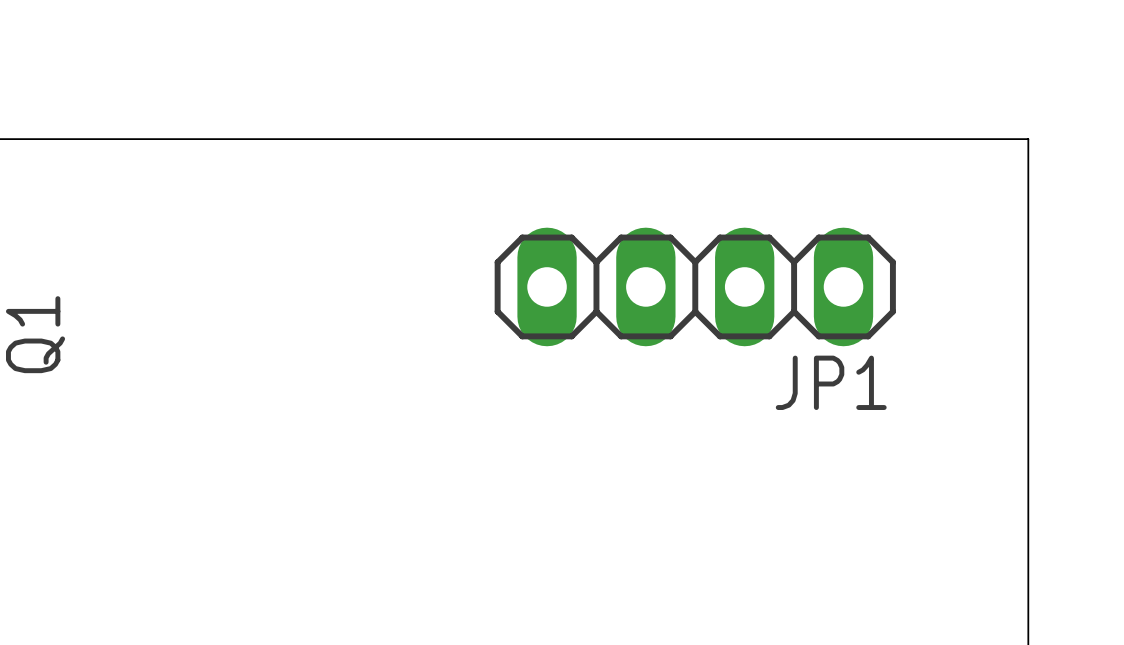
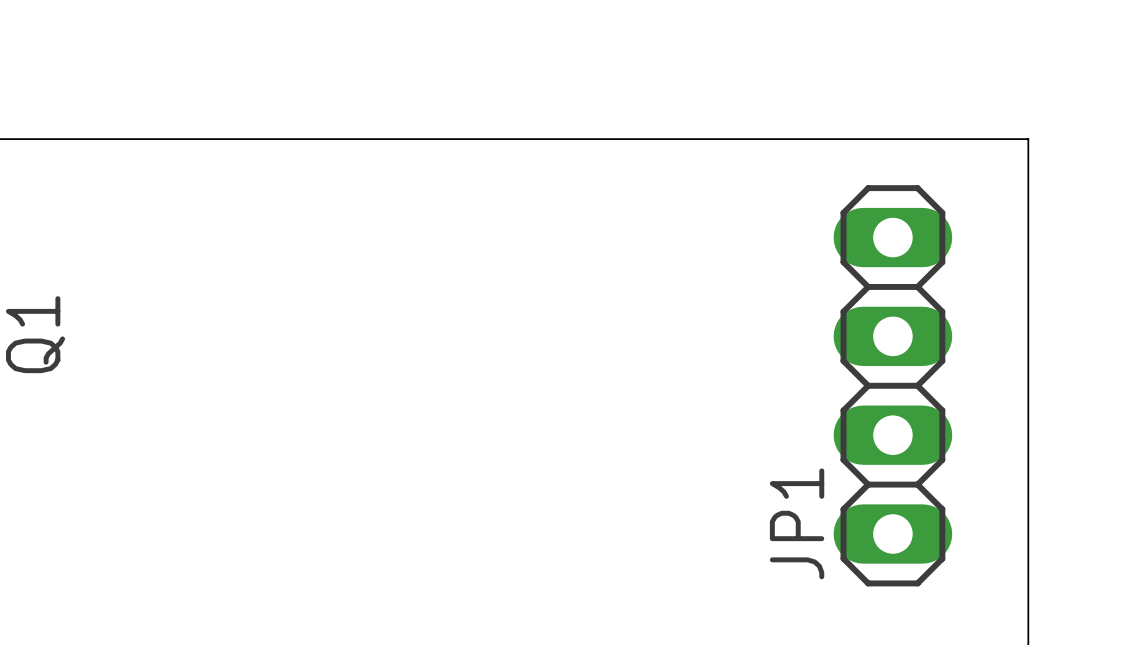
JP1 rotation: 0° (695, 286) -> 90° clockwise (892, 385)

